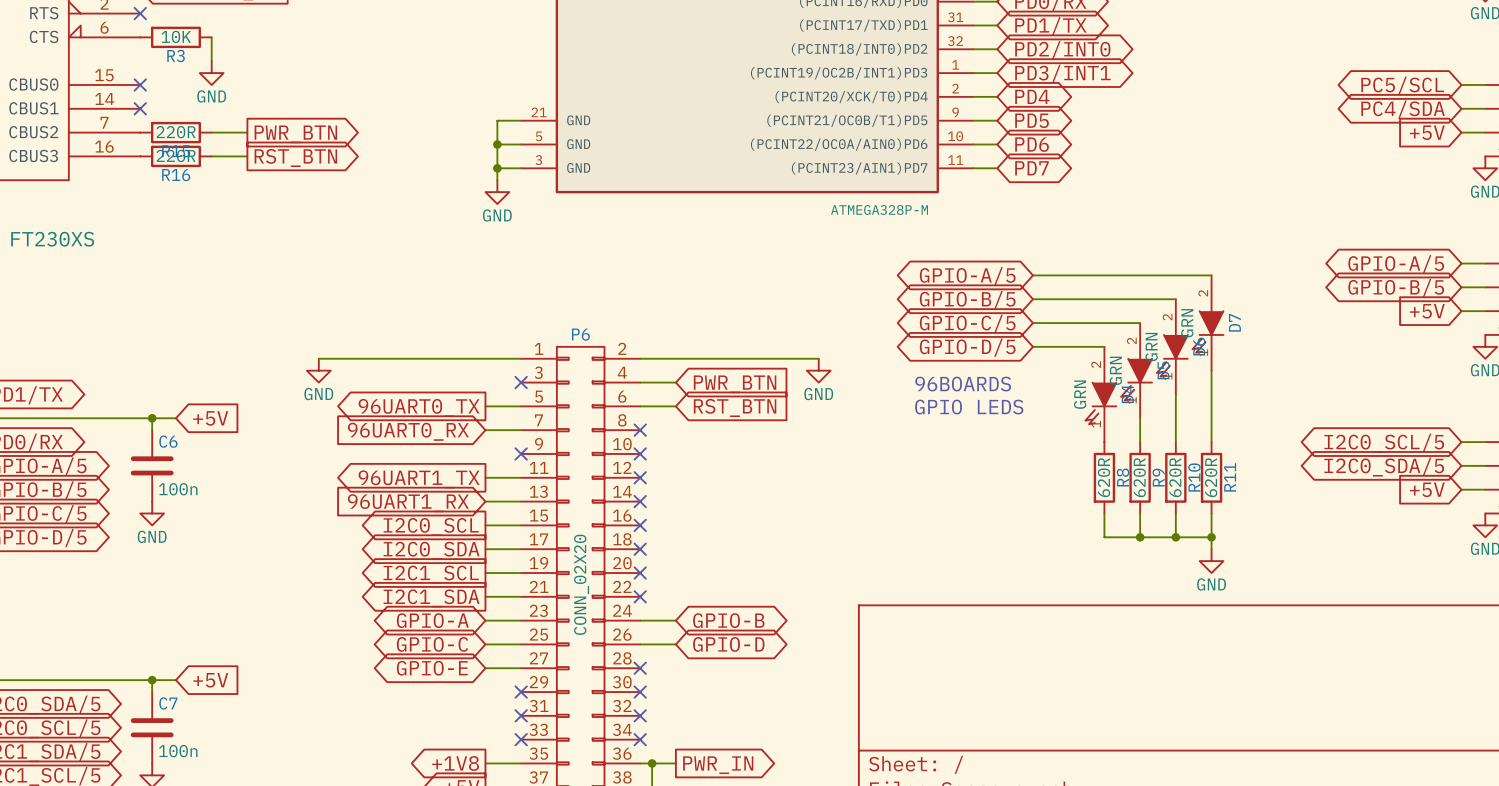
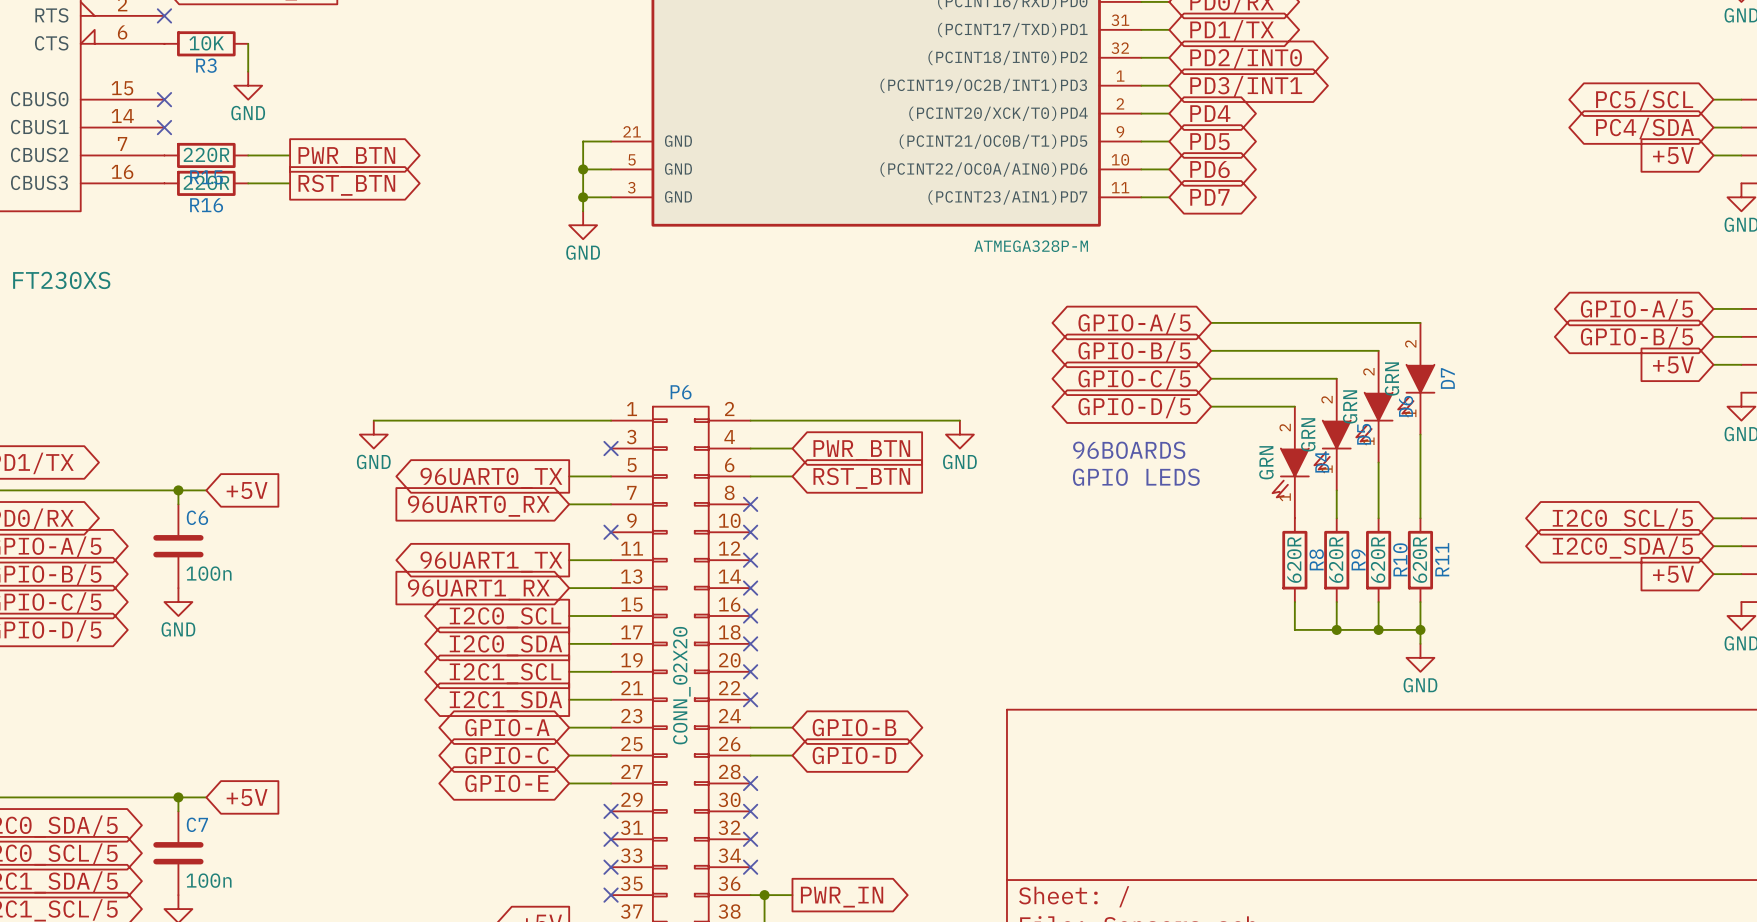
global label: +1V8 (455, 763) -> none
wire: (485, 763) (521, 763) -> none
no-connect mark: none -> (611, 895)

